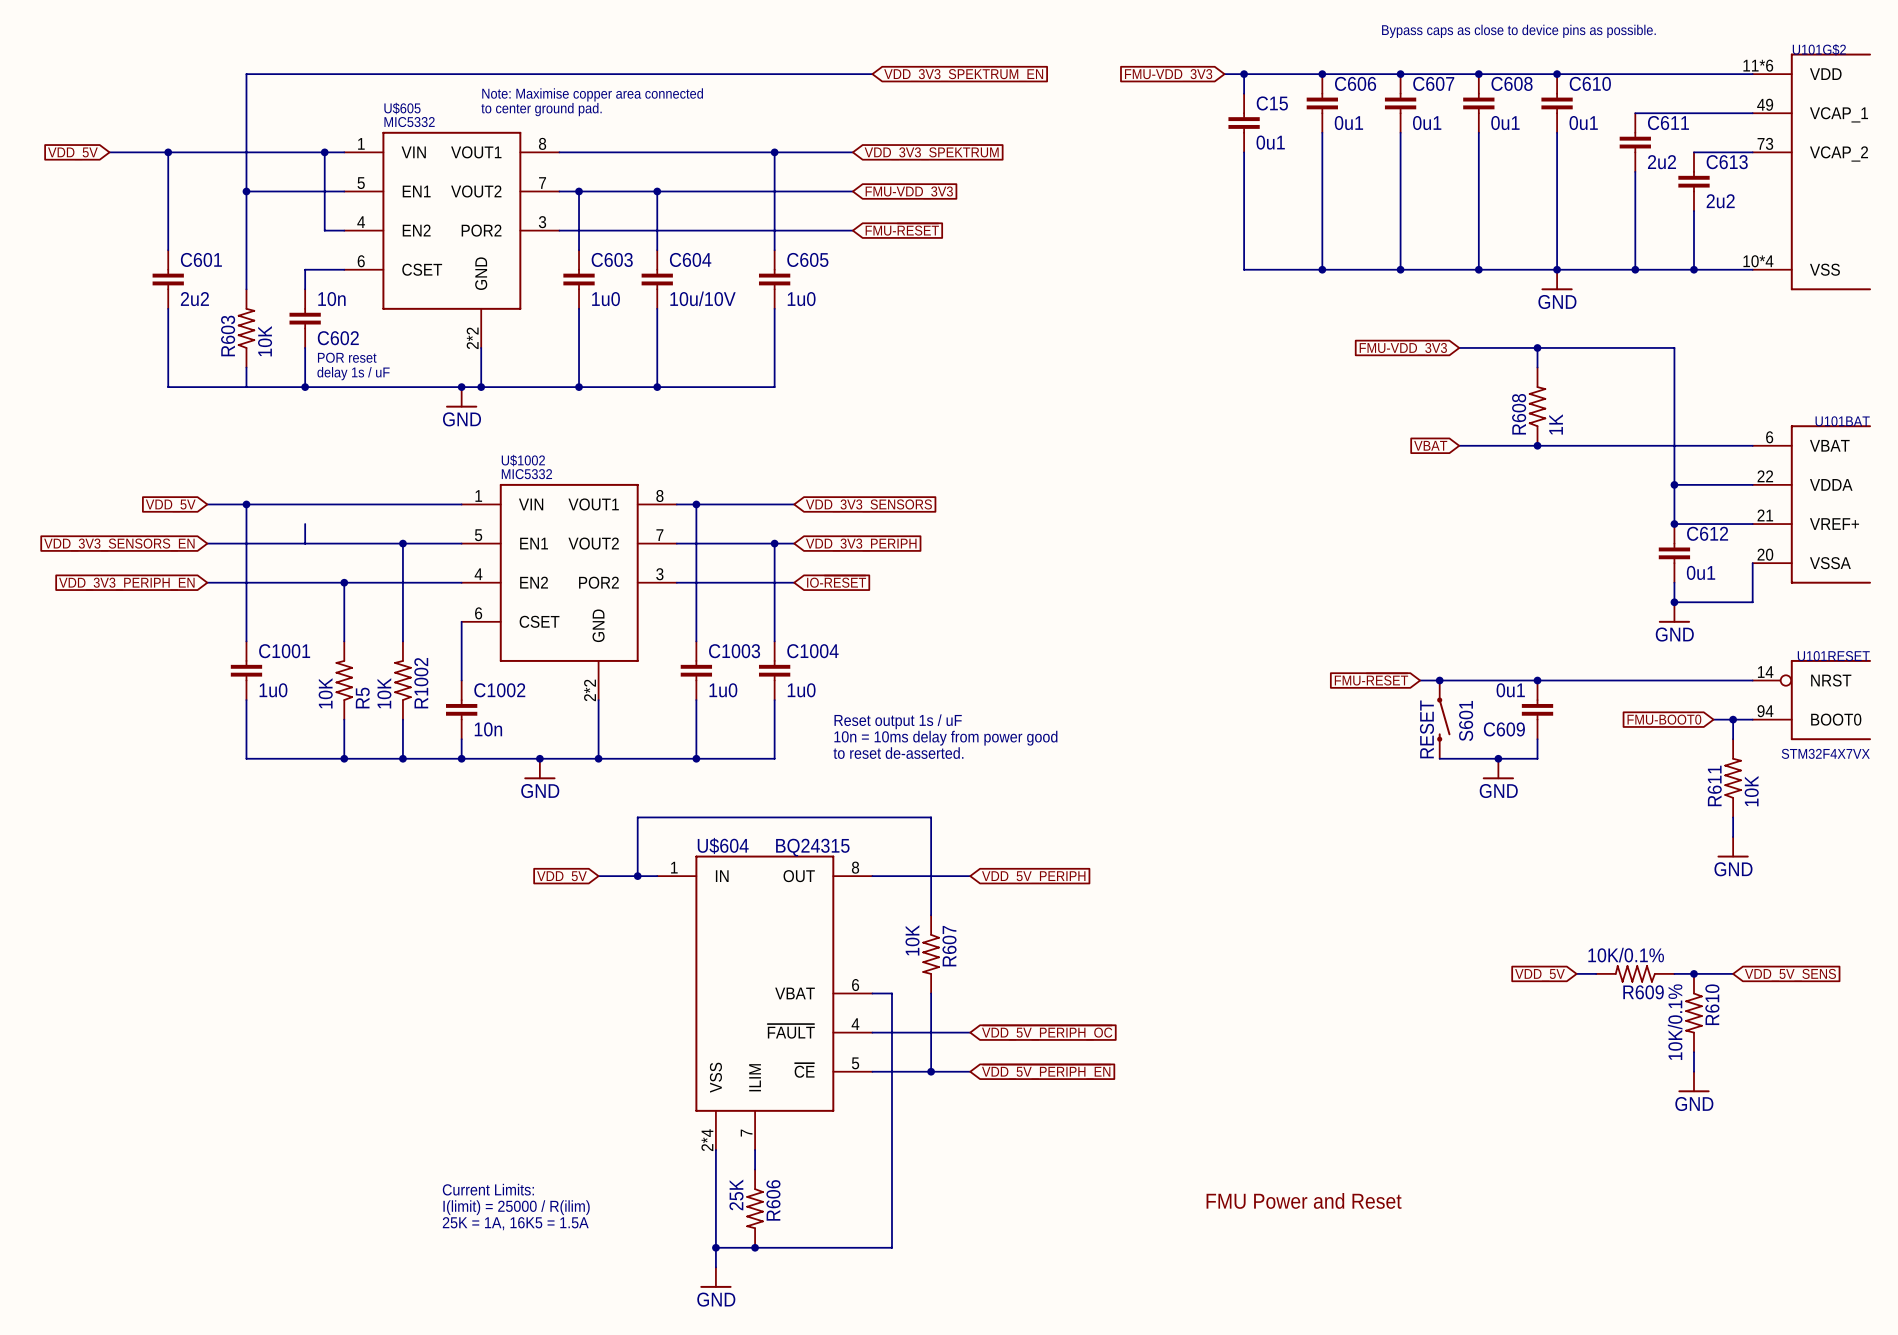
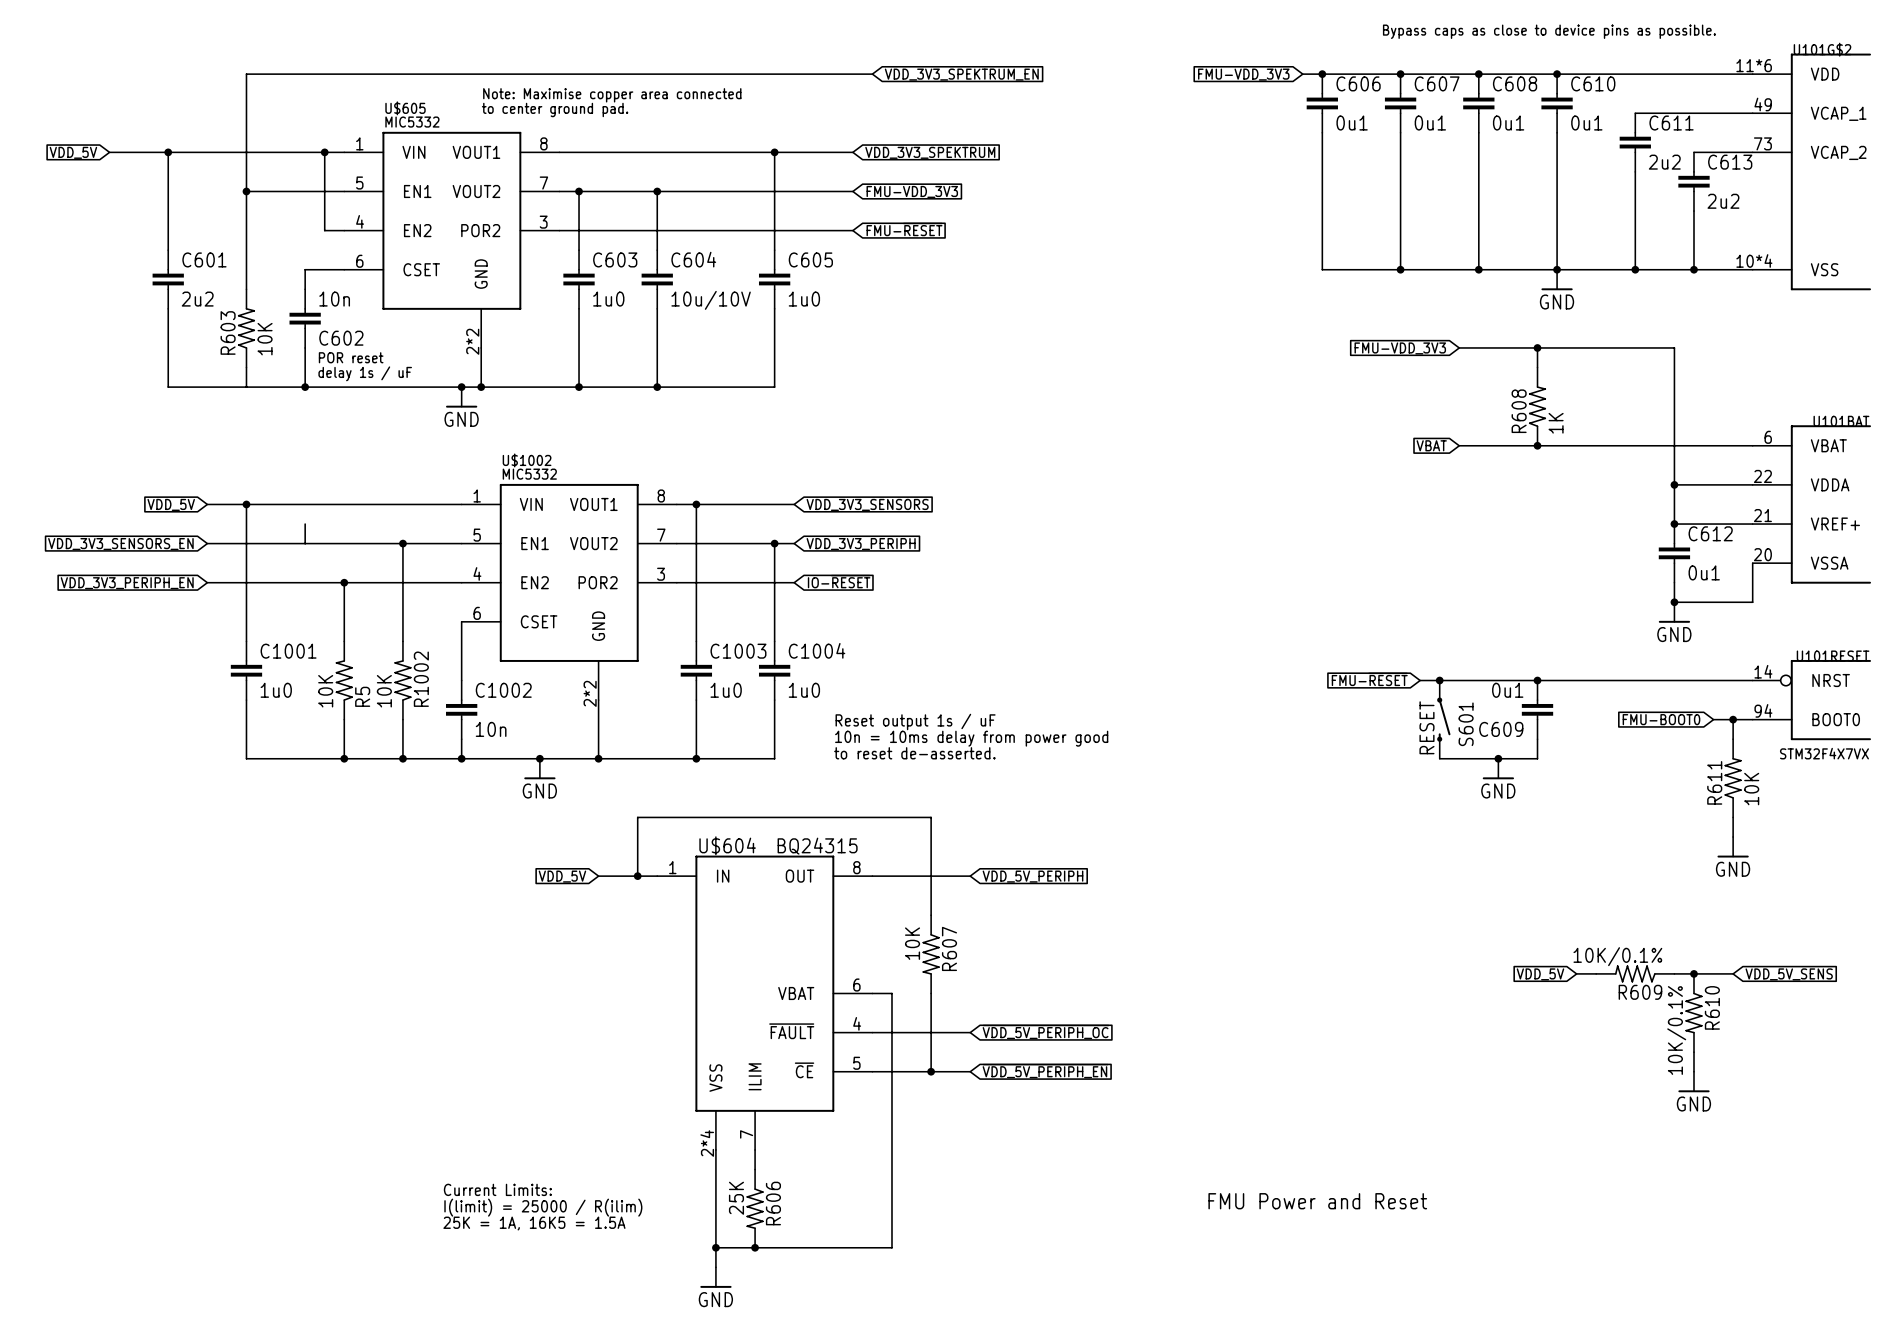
wire: (1224, 74) (1302, 74) -> none
wire: (1244, 74) (1244, 93) -> none
junction: (1244, 74) -> none
global label position: FMU-VDD_3V3 (1168, 75) -> FMU-VDD_3V3 (1243, 74)
C15: 0u1 (1244, 123) -> none
wire: (1244, 152) (1244, 269) (1322, 269) -> none
junction: (1322, 269) -> none

